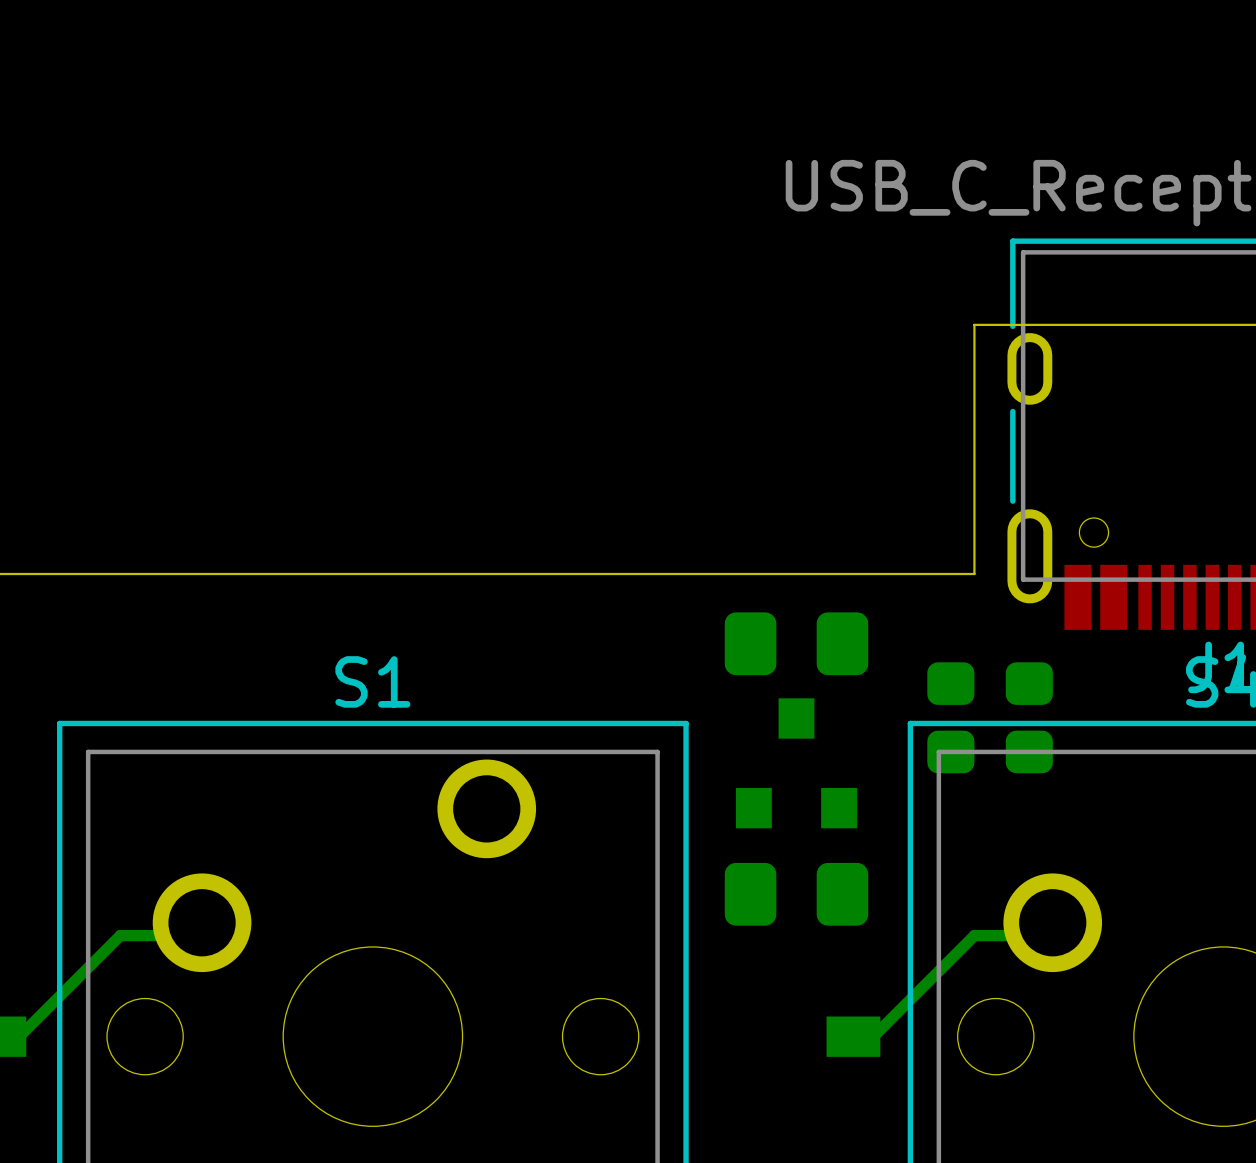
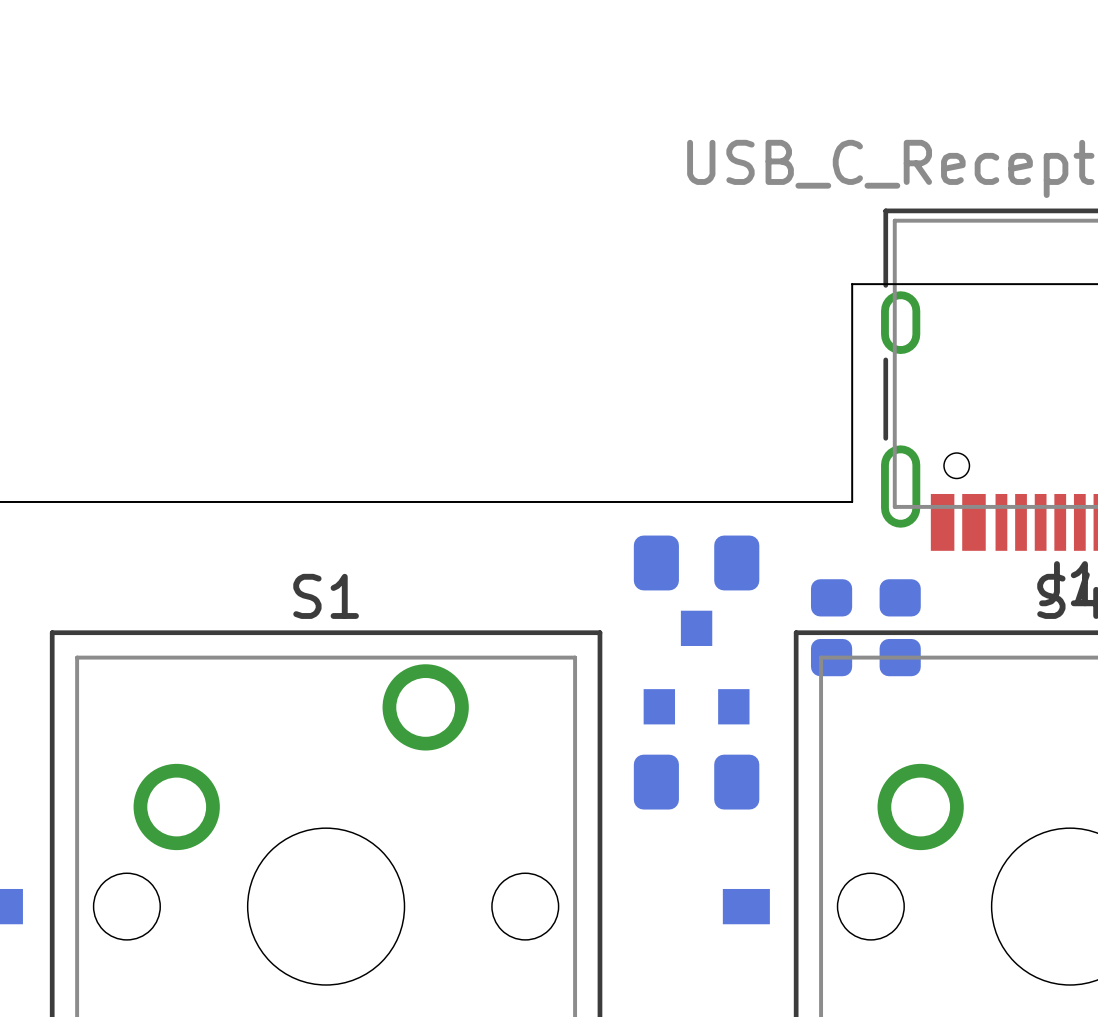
bottom track: (195, 935) (120, 935) (12, 1043) -> none
bottom track: (1050, 935) (974, 935) (866, 1043) -> none

